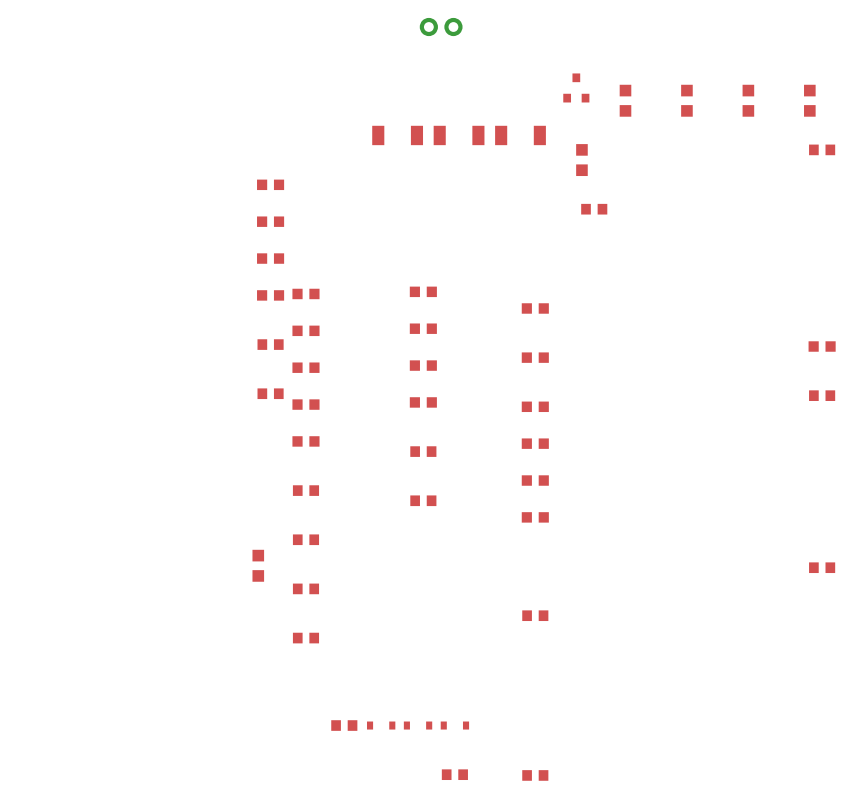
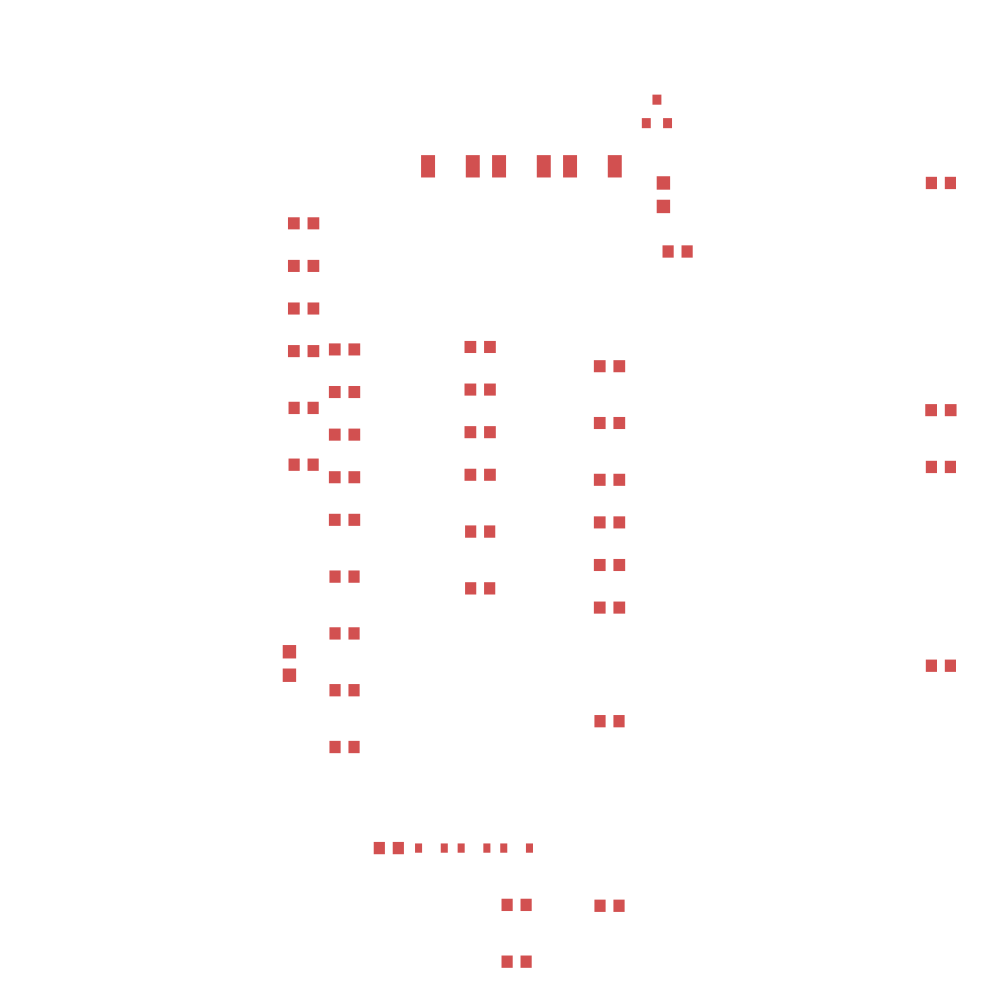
part: (441, 27) -> none
part: (625, 100) -> none
part: (686, 100) -> none
part: (748, 100) -> none
part: (809, 100) -> none

